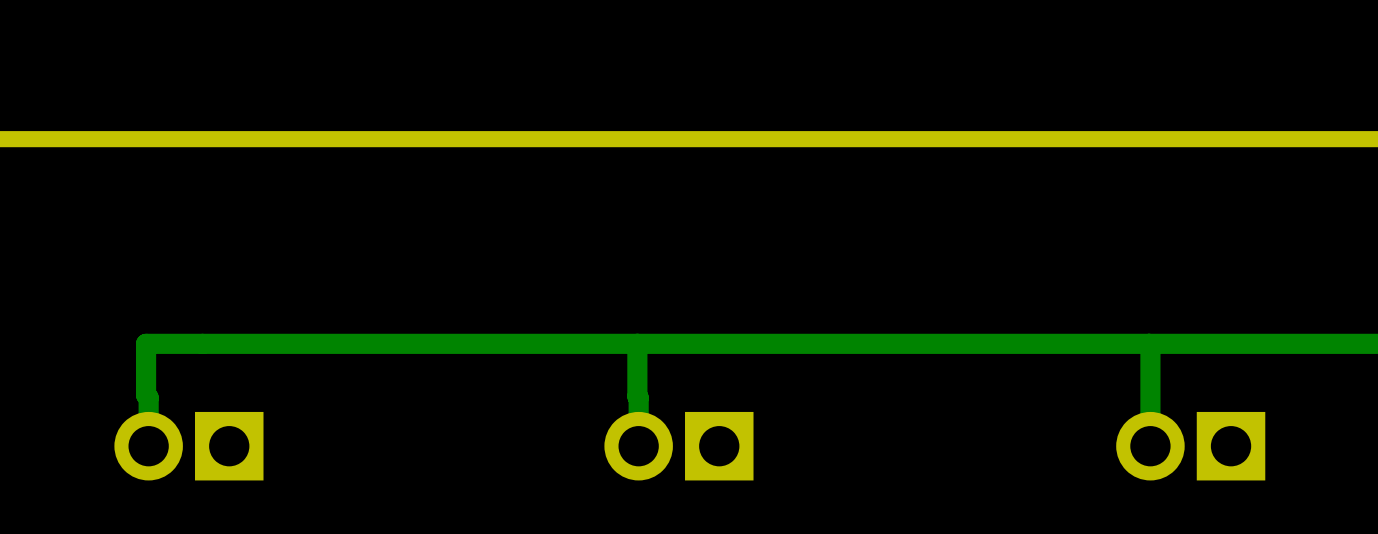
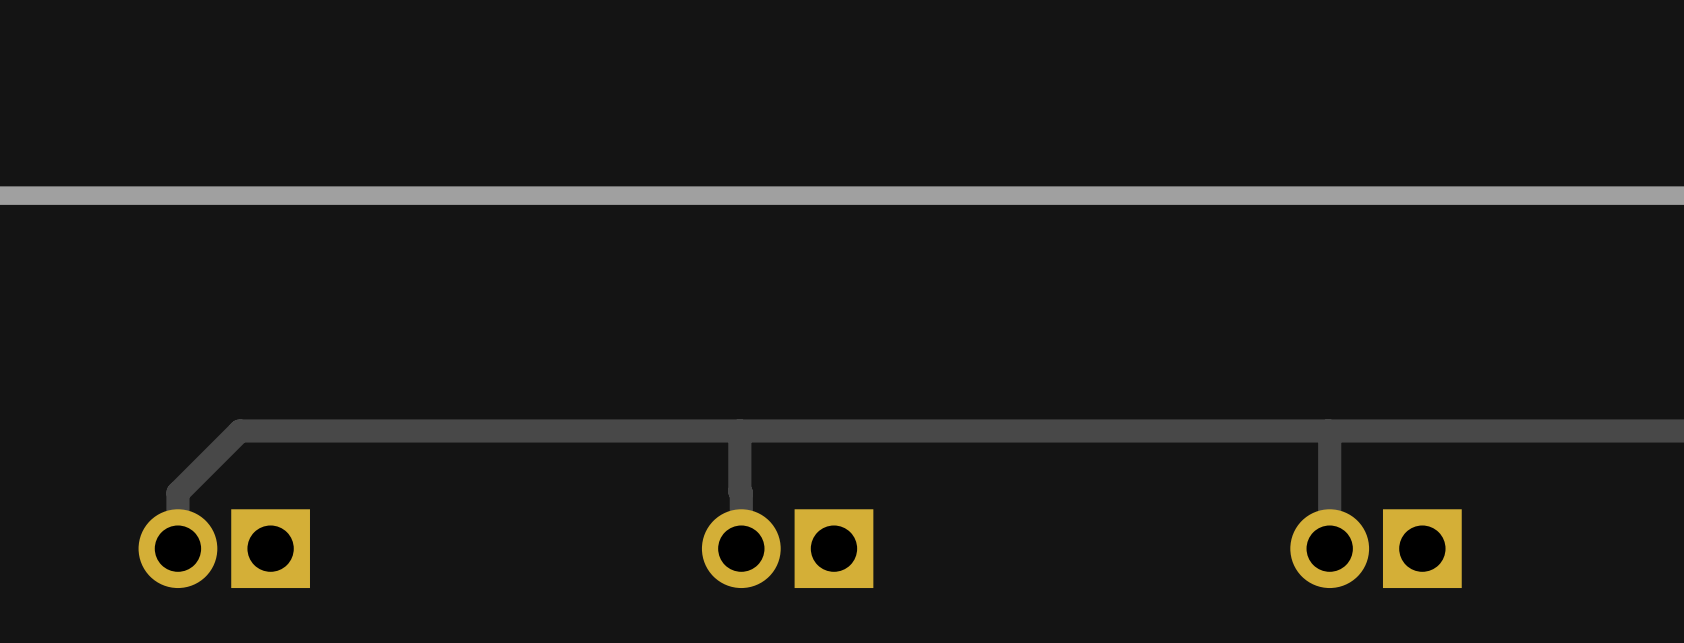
track: (202, 343) (146, 343) (146, 395) (148, 397) -> (239, 430) (177, 492)

